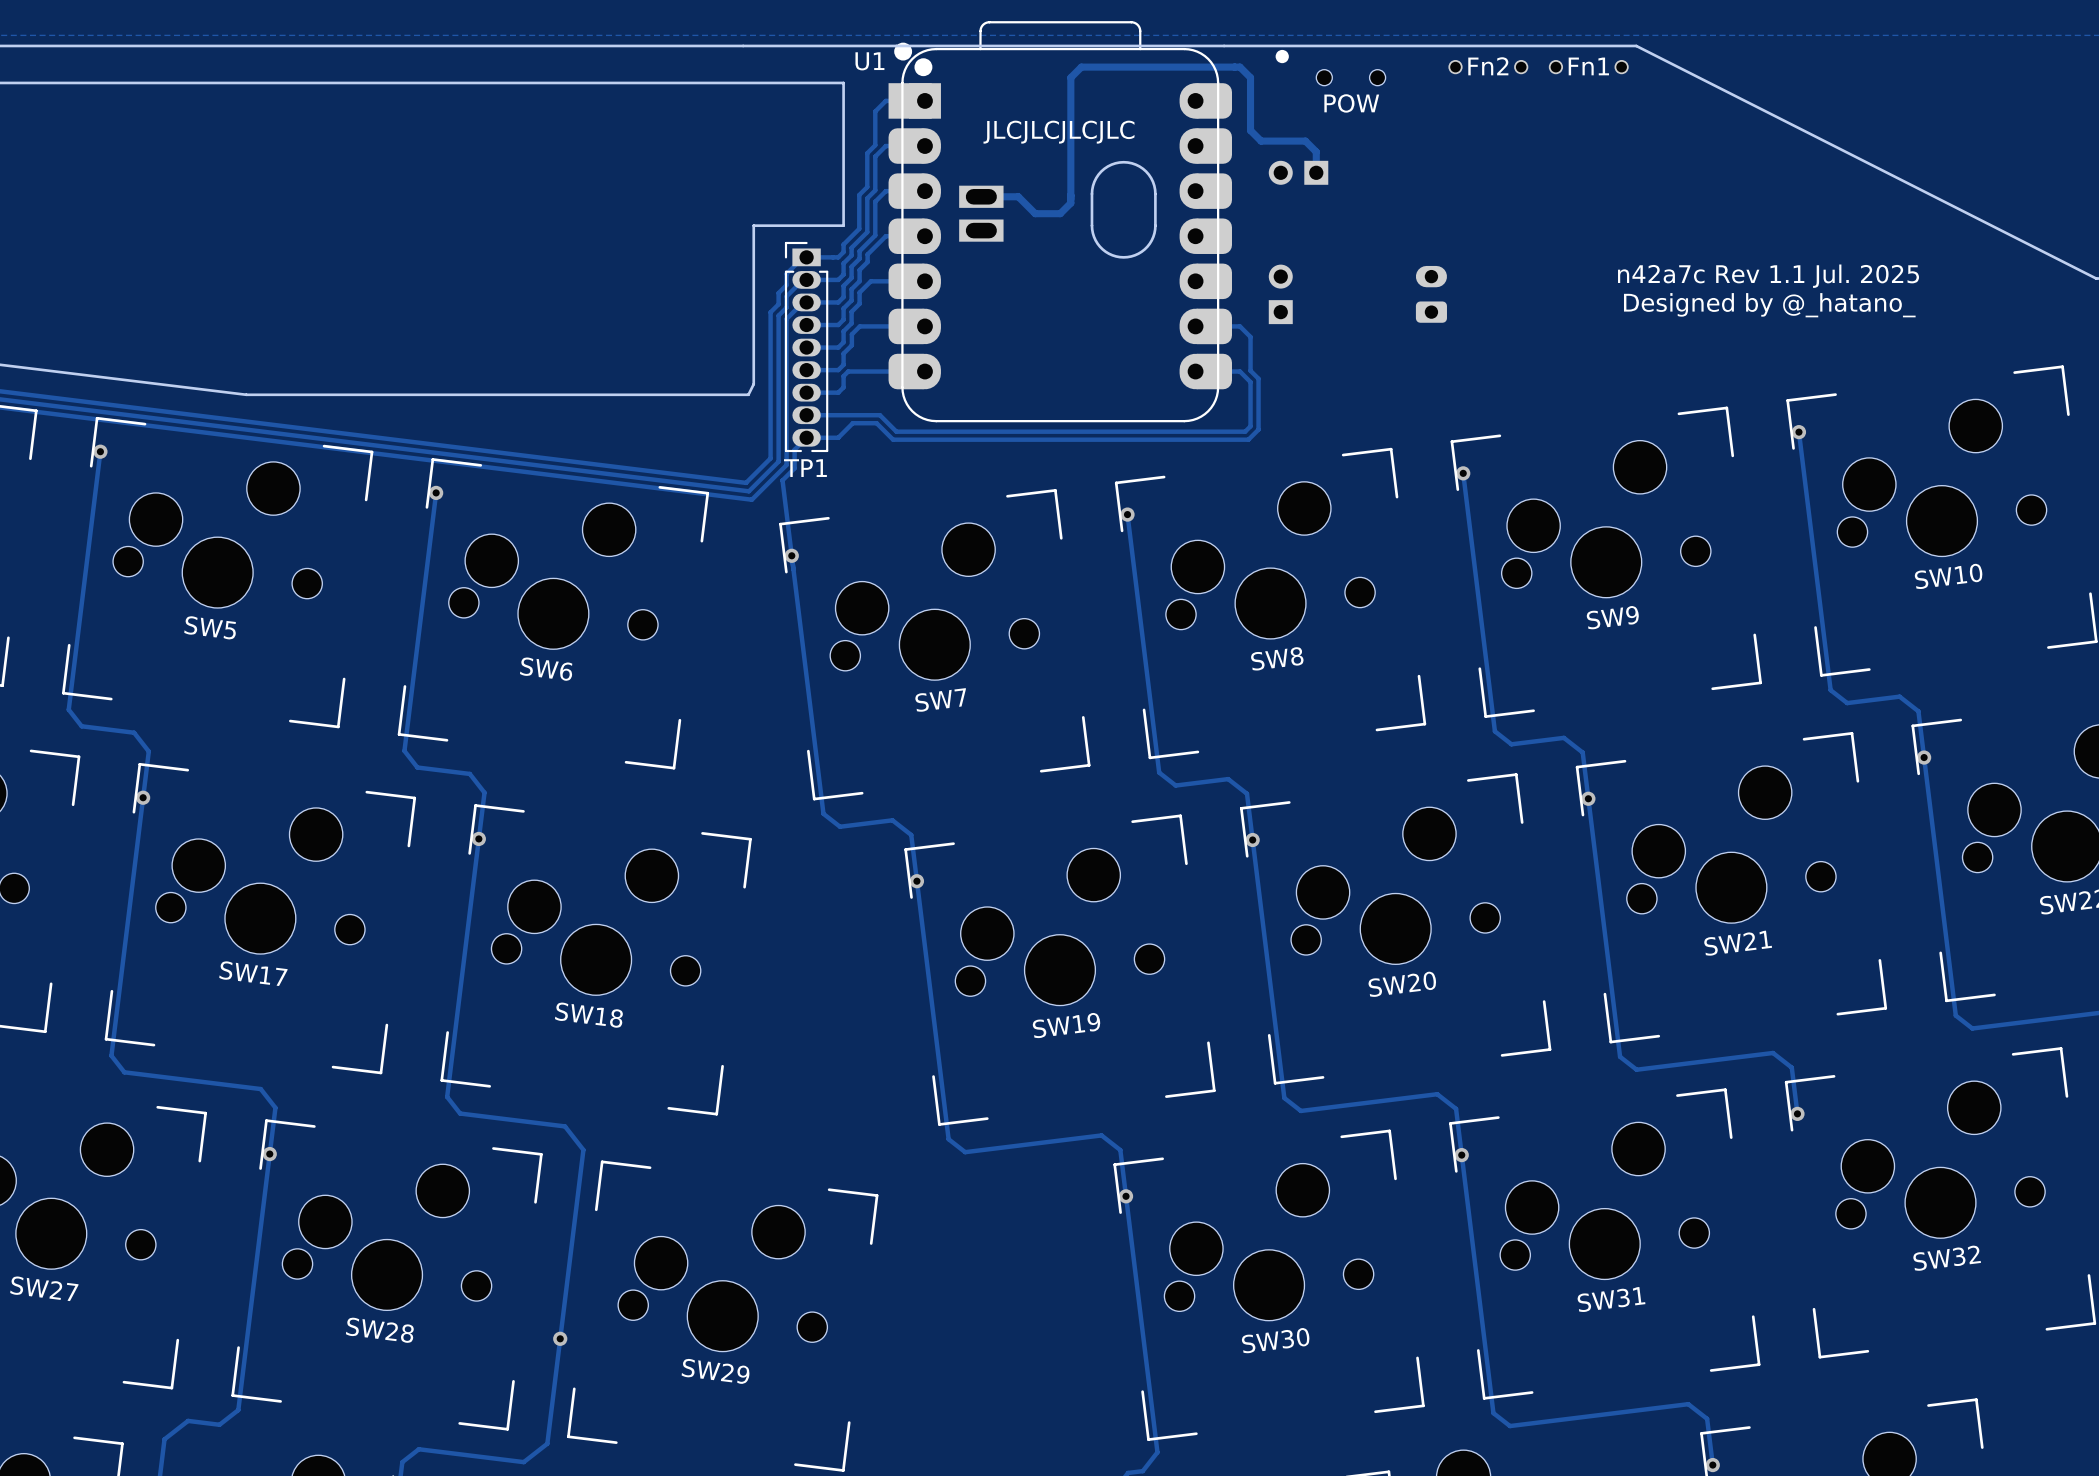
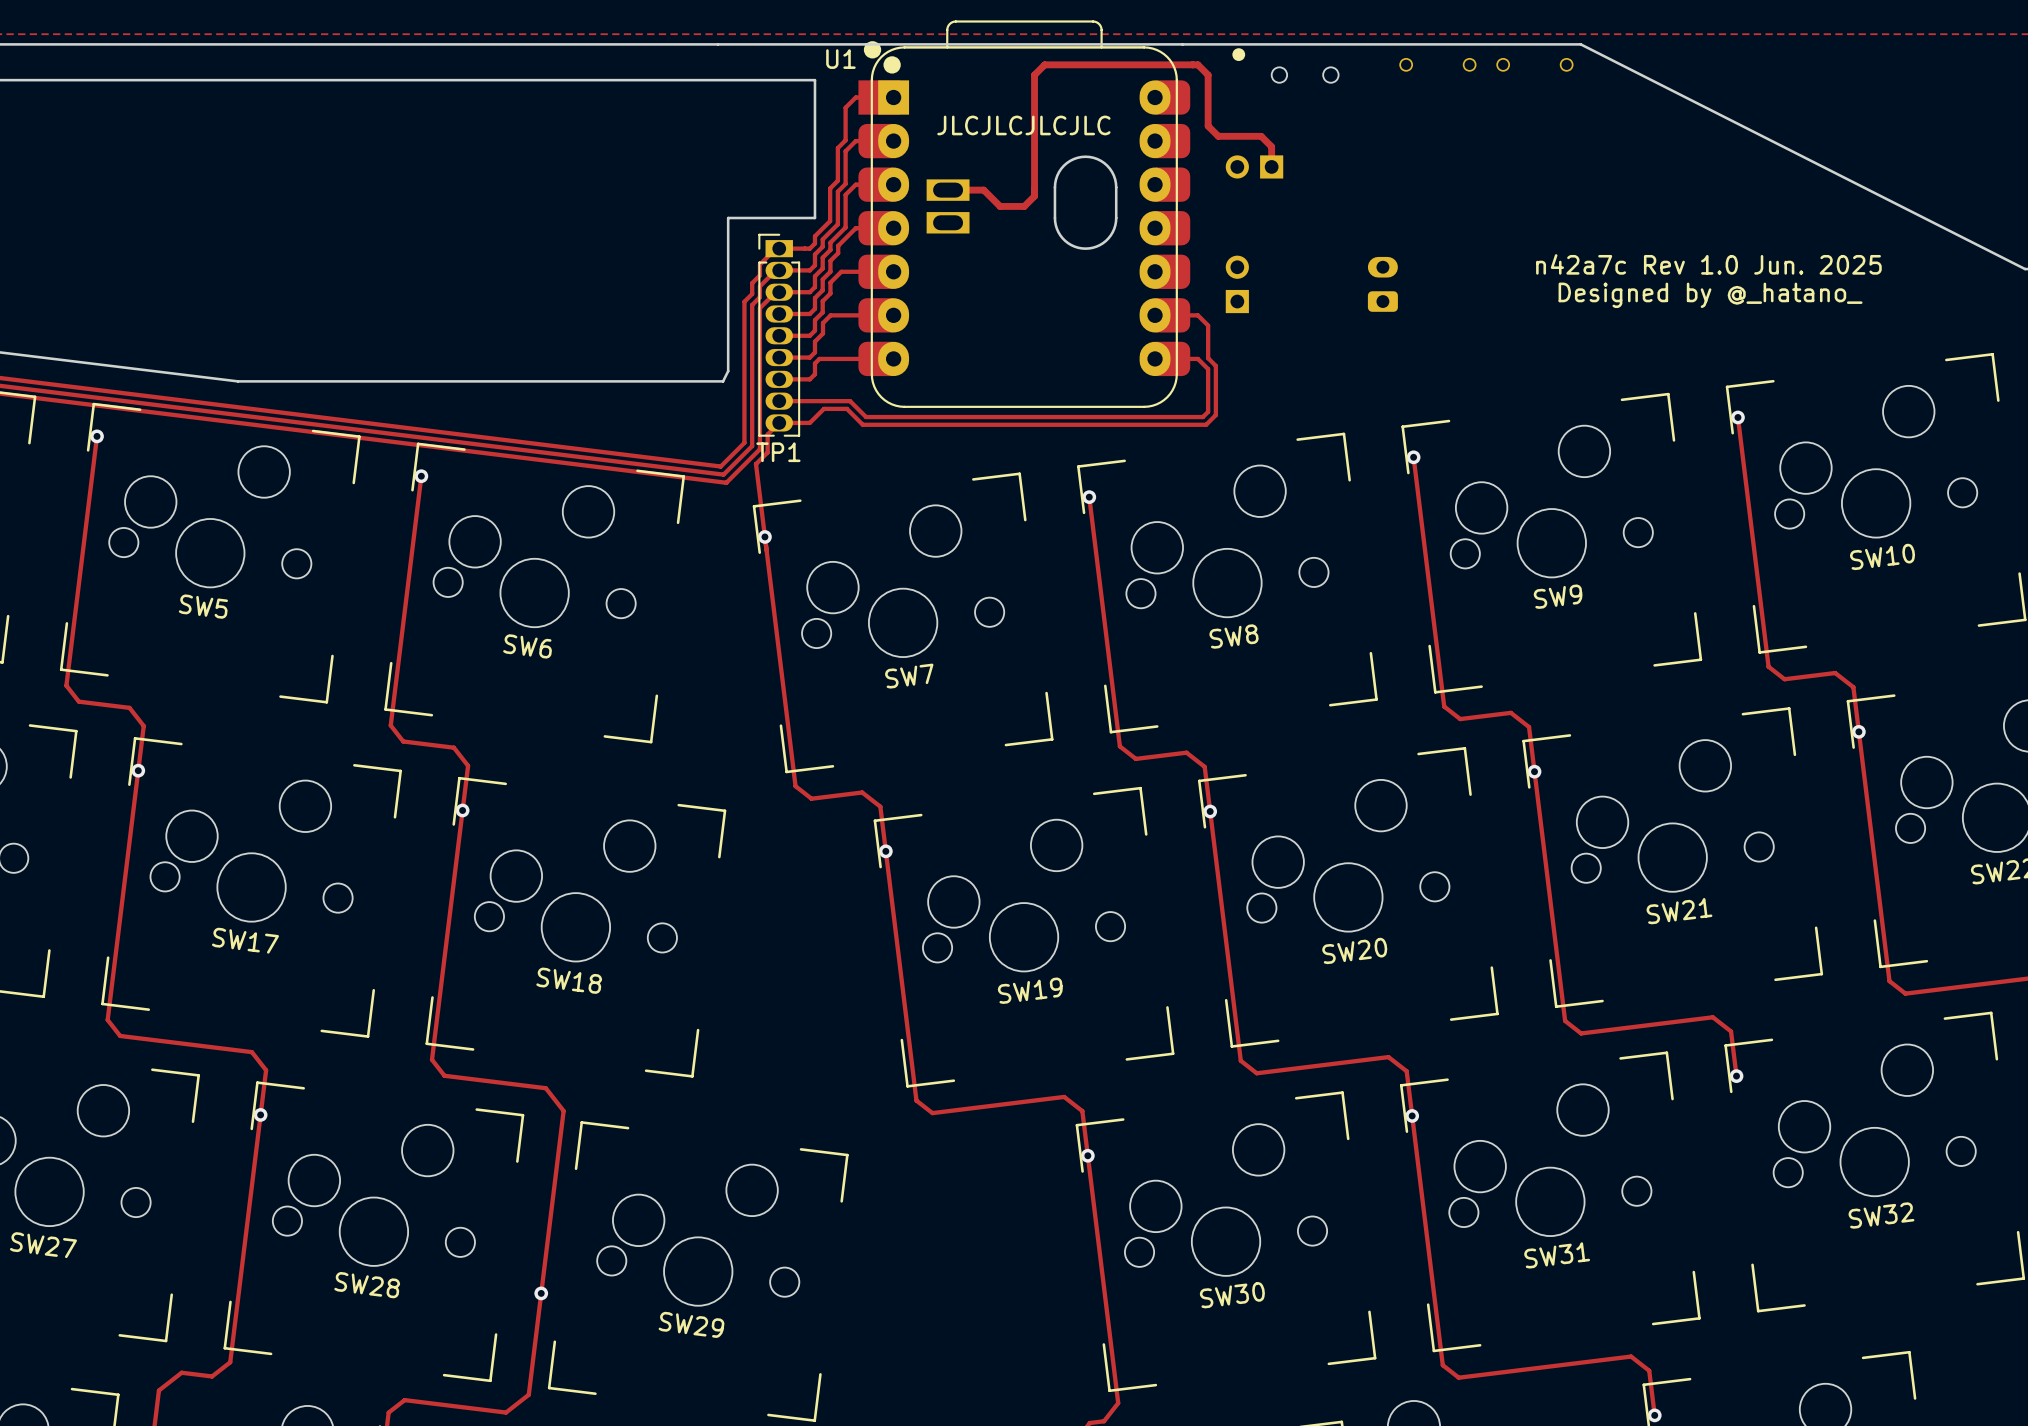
text: Fn2 (1488, 66) -> none
text: Fn1 (1588, 66) -> none
text: POW (1351, 103) -> none
text: n42a7c Rev 1.1 Jul. 2025 (1768, 276) -> n42a7c Rev 1.0 Jun. 2025 (1708, 264)

